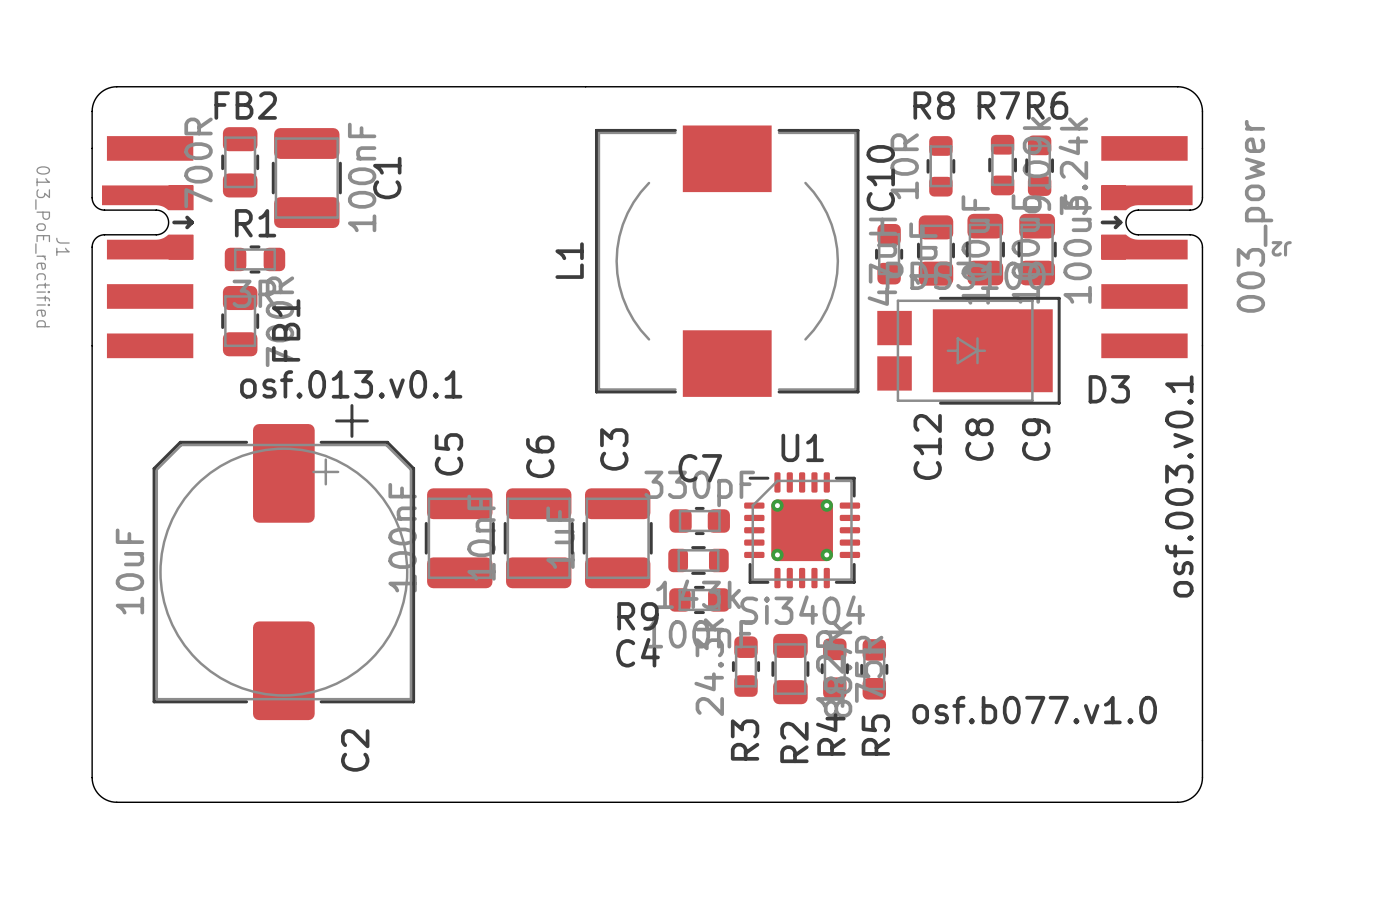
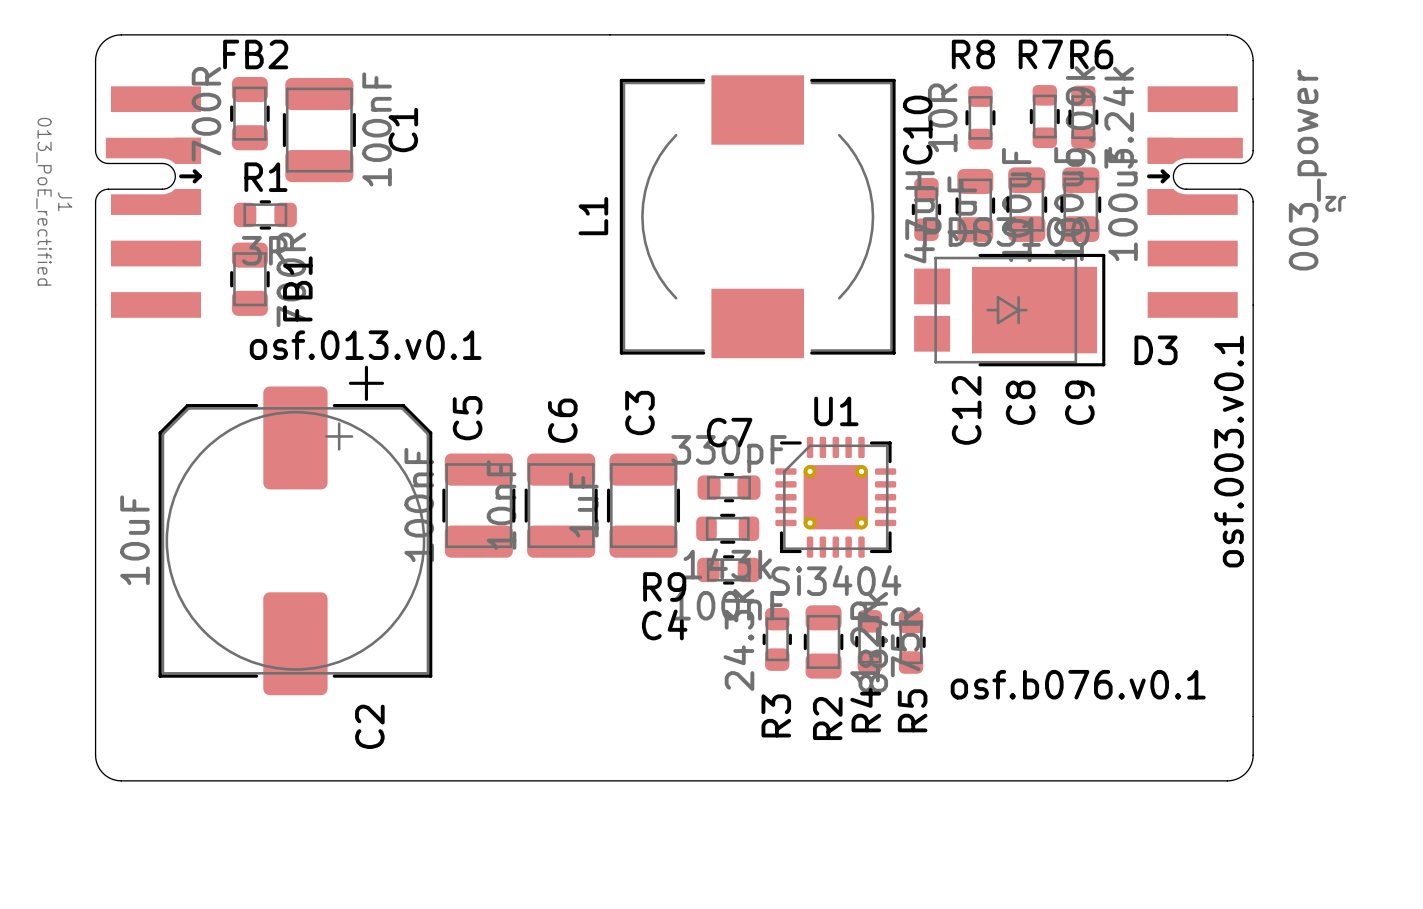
text: osf.b077.v1.0 (1034, 710) -> osf.b076.v0.1 (1078, 684)

